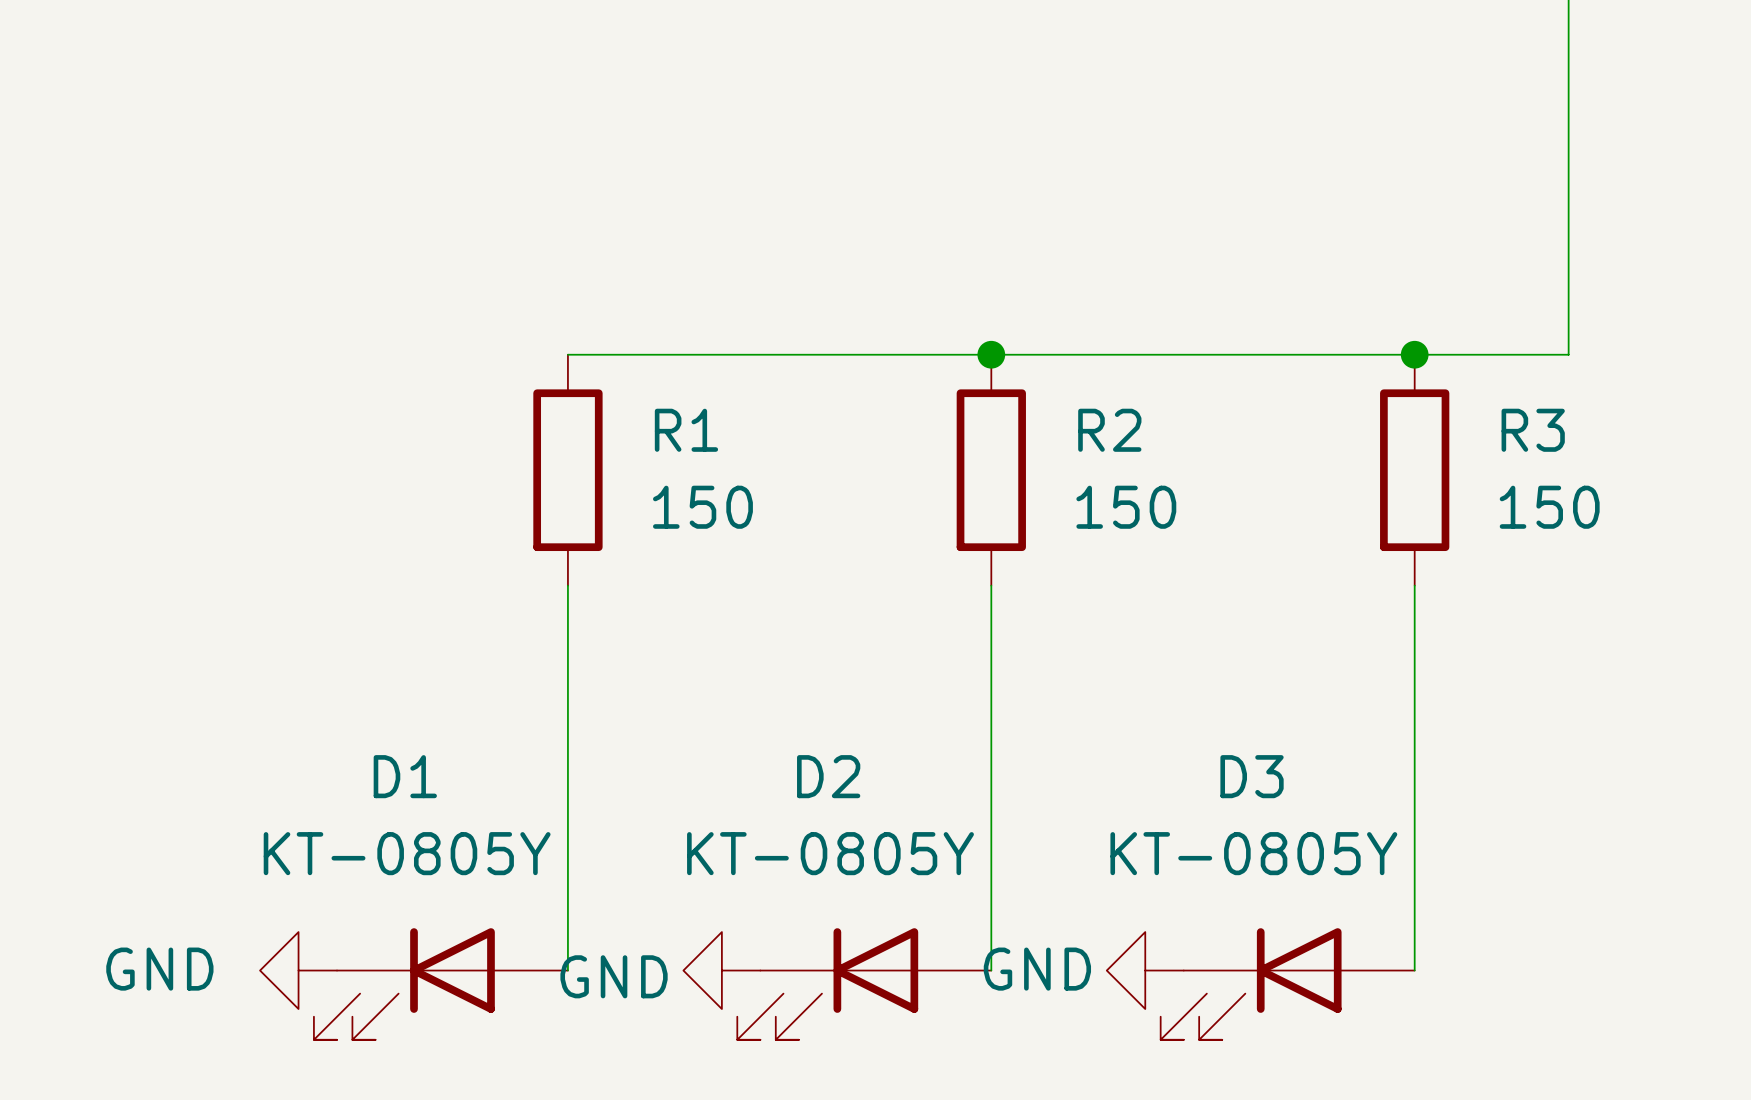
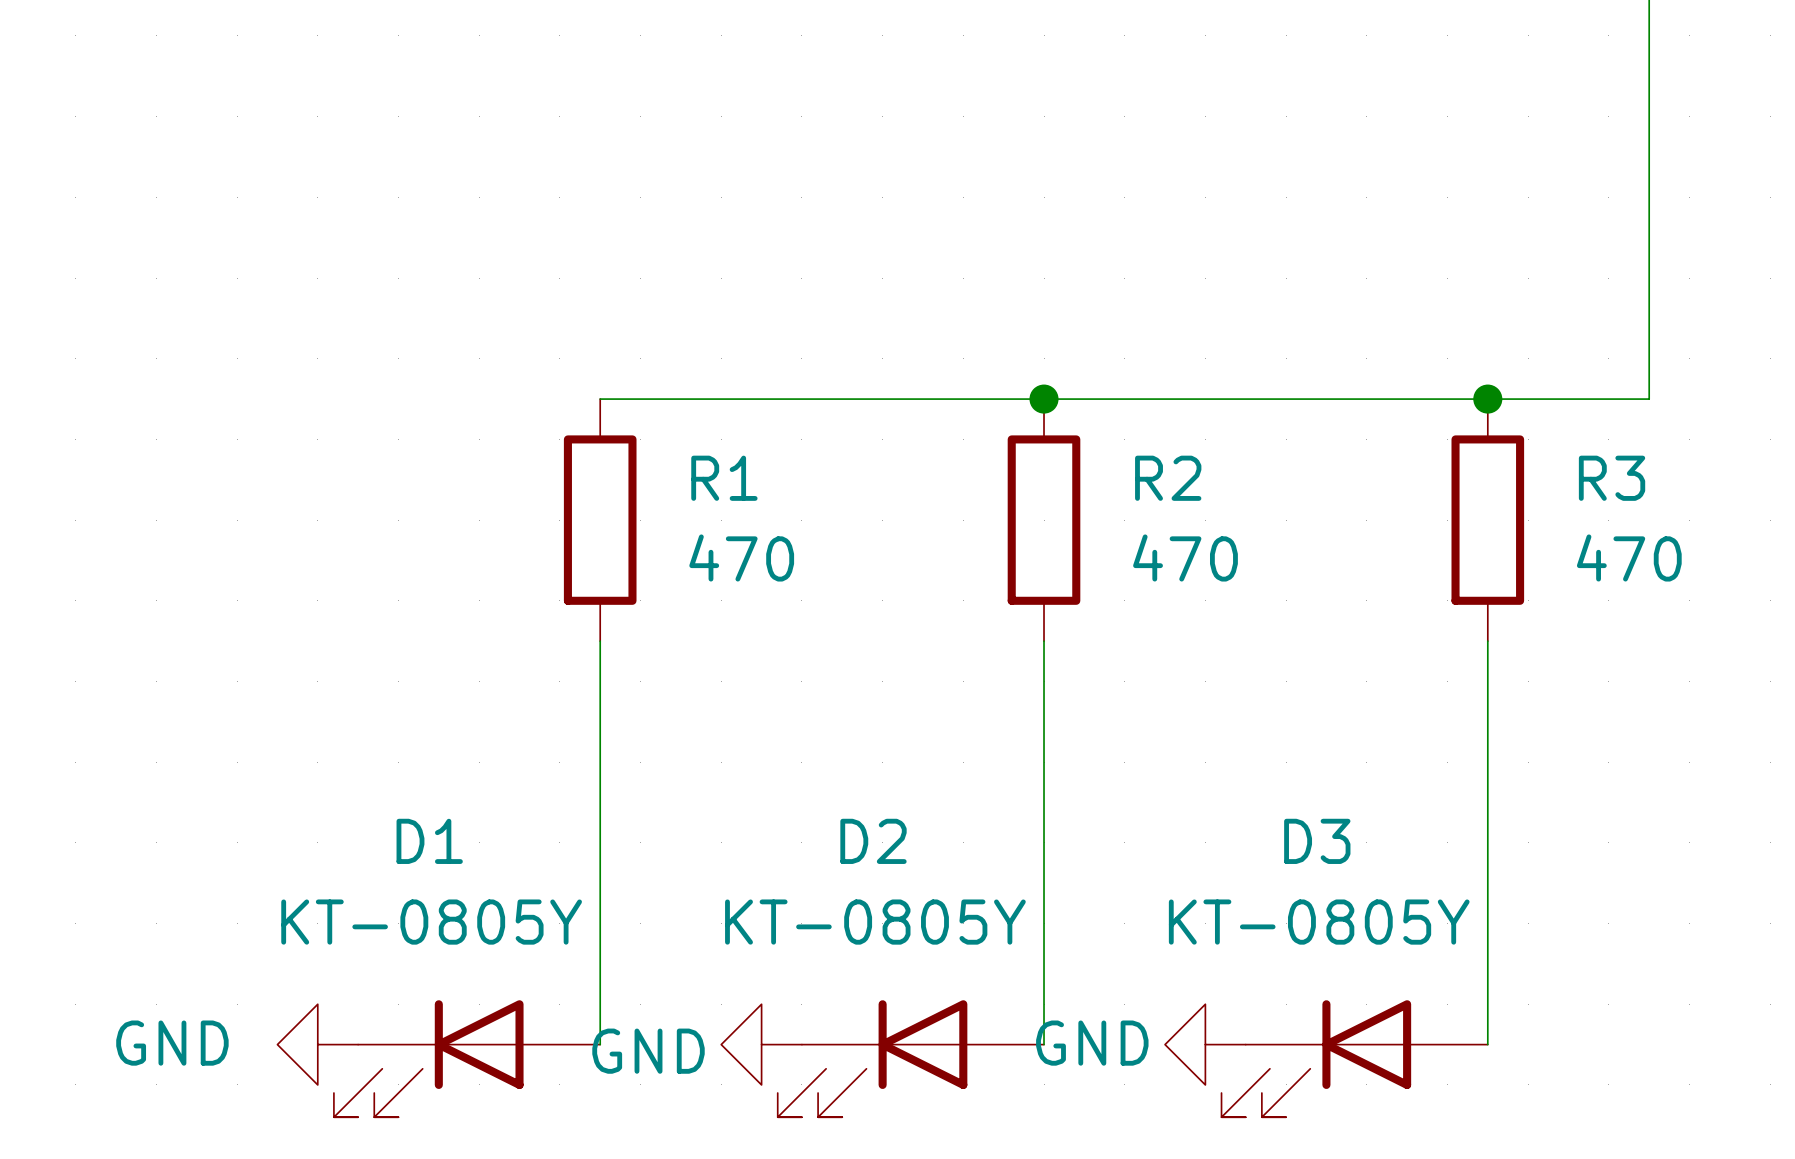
R1 value: 150 (702, 507) -> 470 (741, 557)
R2 value: 150 (1126, 507) -> 470 (1185, 557)
R3 value: 150 (1549, 507) -> 470 (1629, 557)

